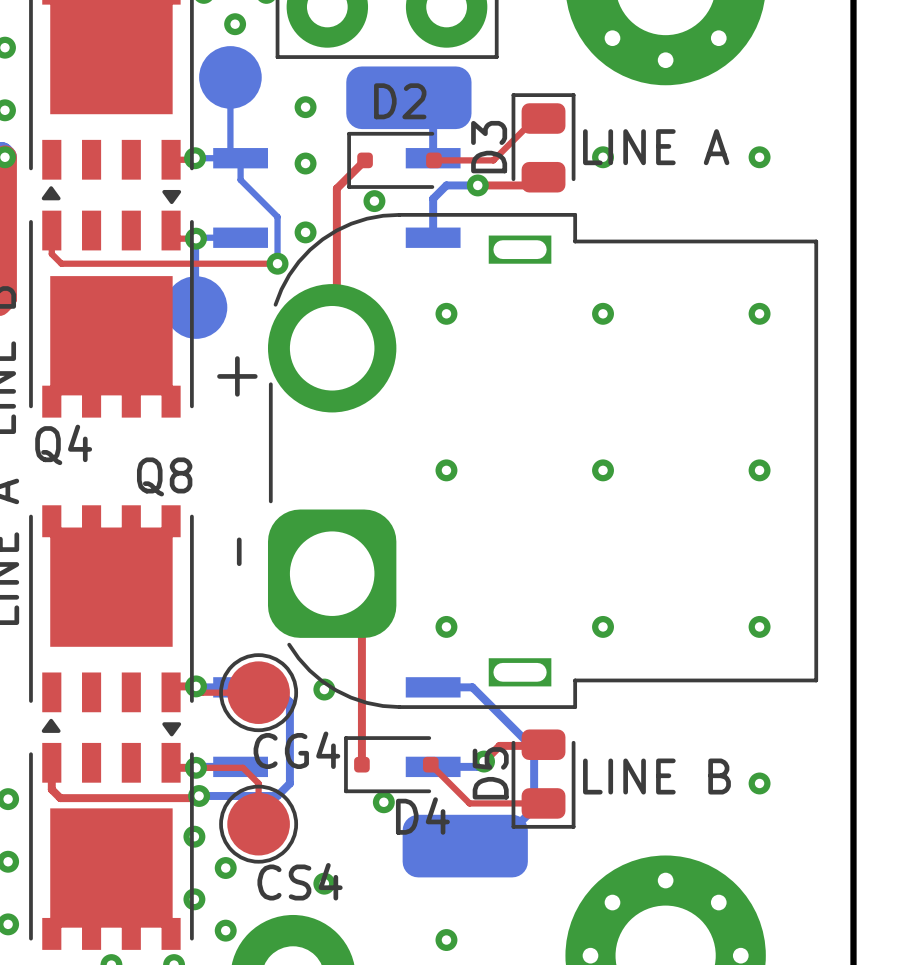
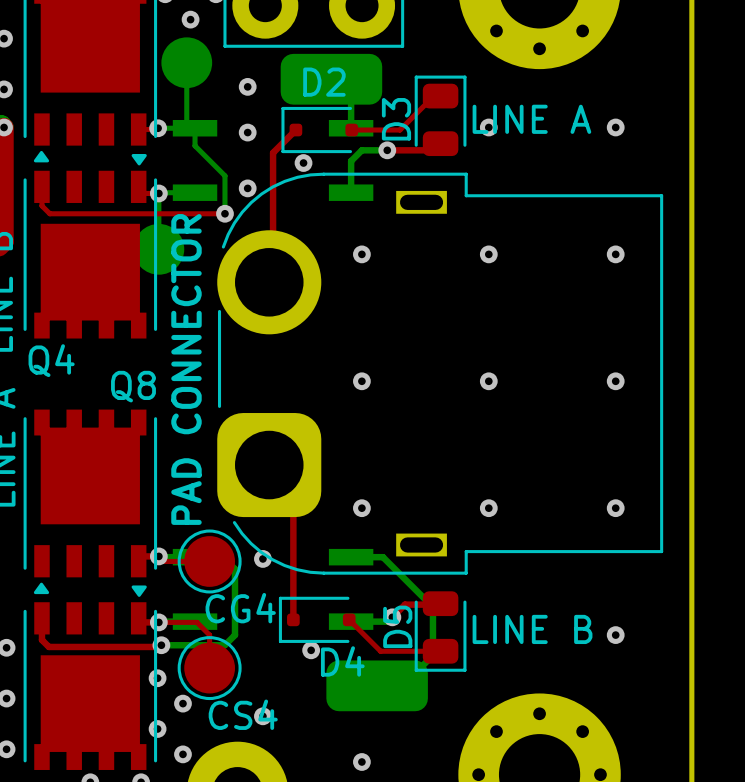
part text: + (237, 376) -> none
text: none -> PAD CONNECTOR (186, 369)
part text: - (239, 551) -> none

